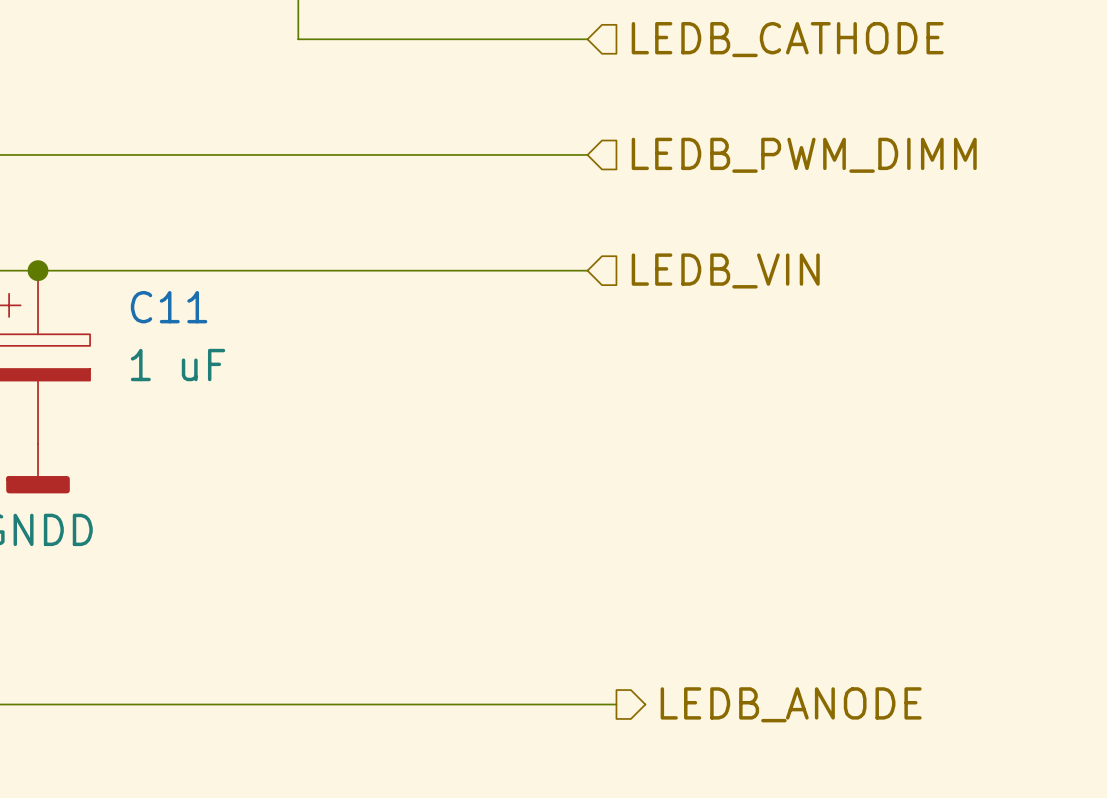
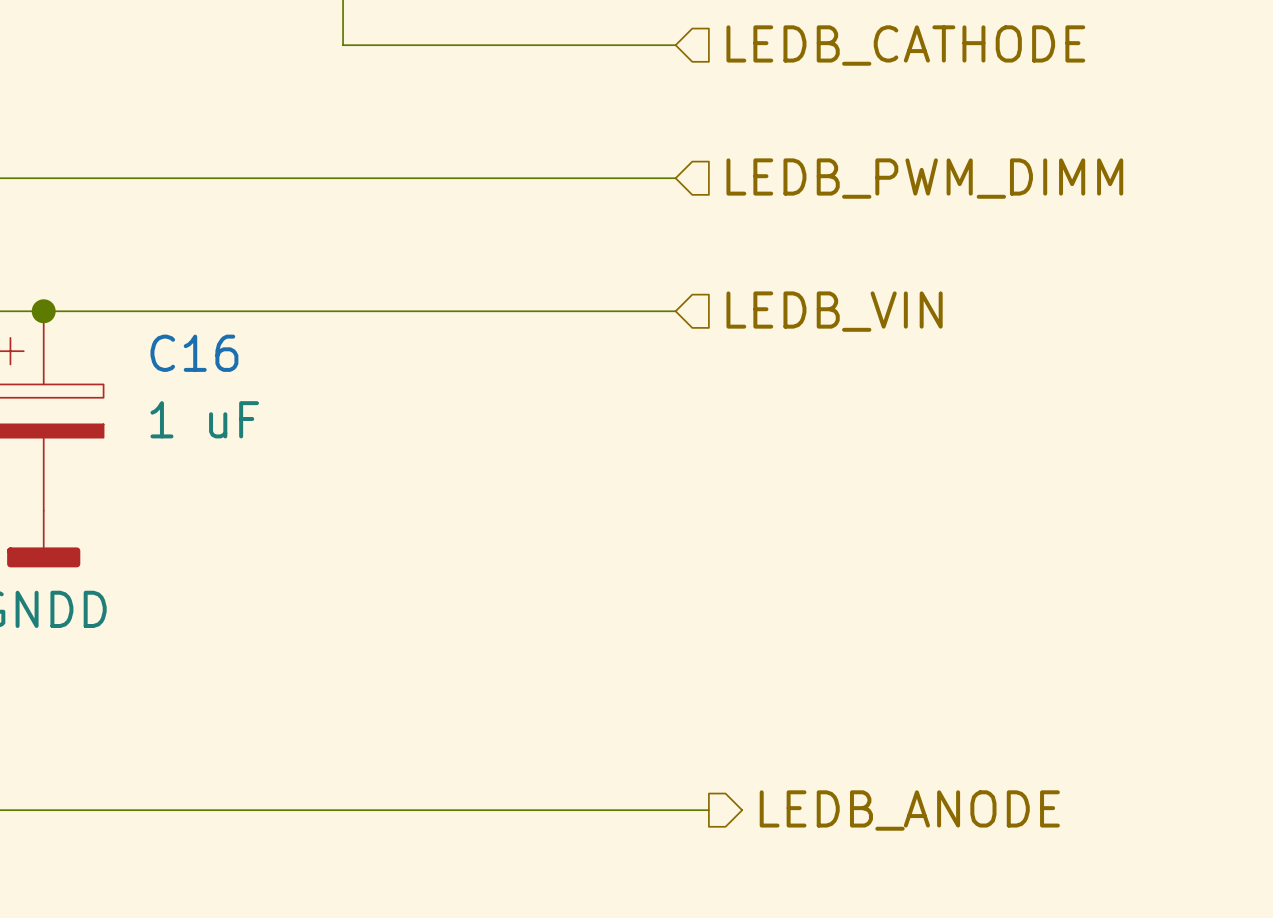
C11 name: C11 (169, 307) -> C16 (194, 353)

